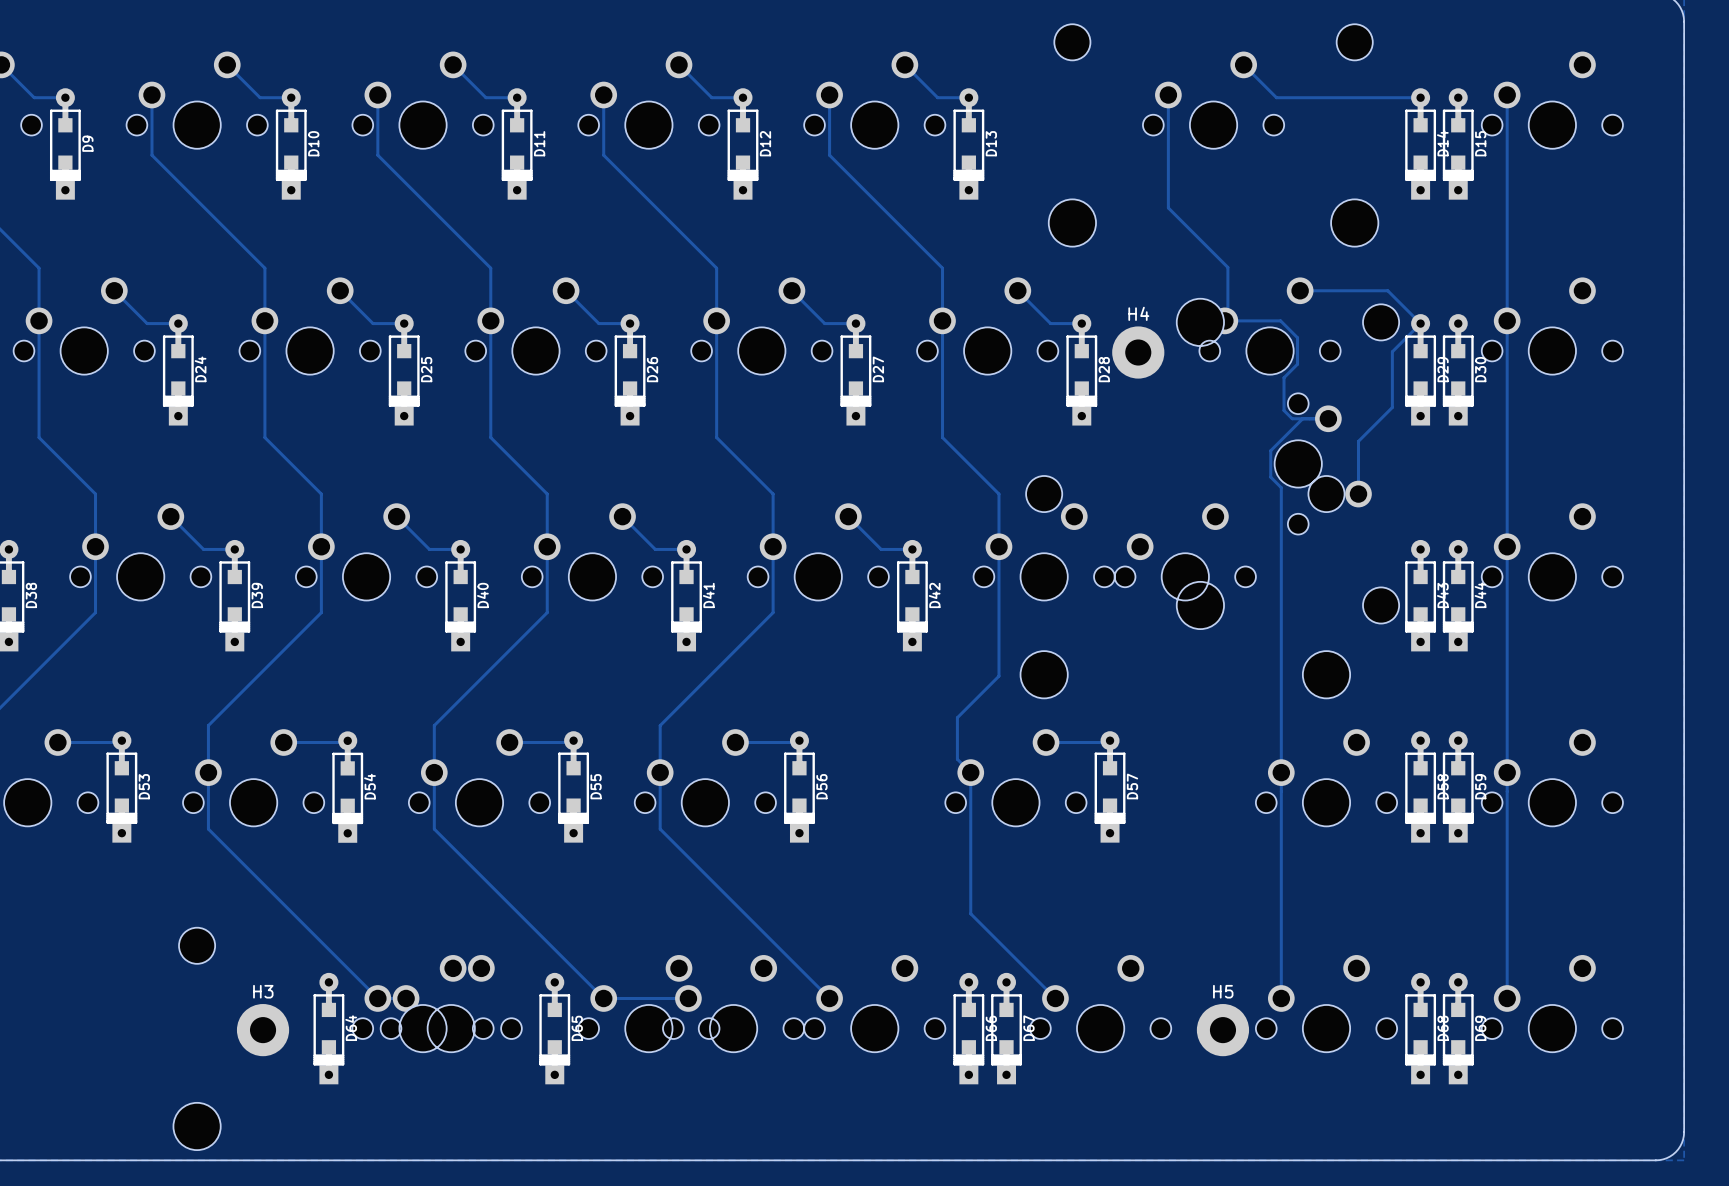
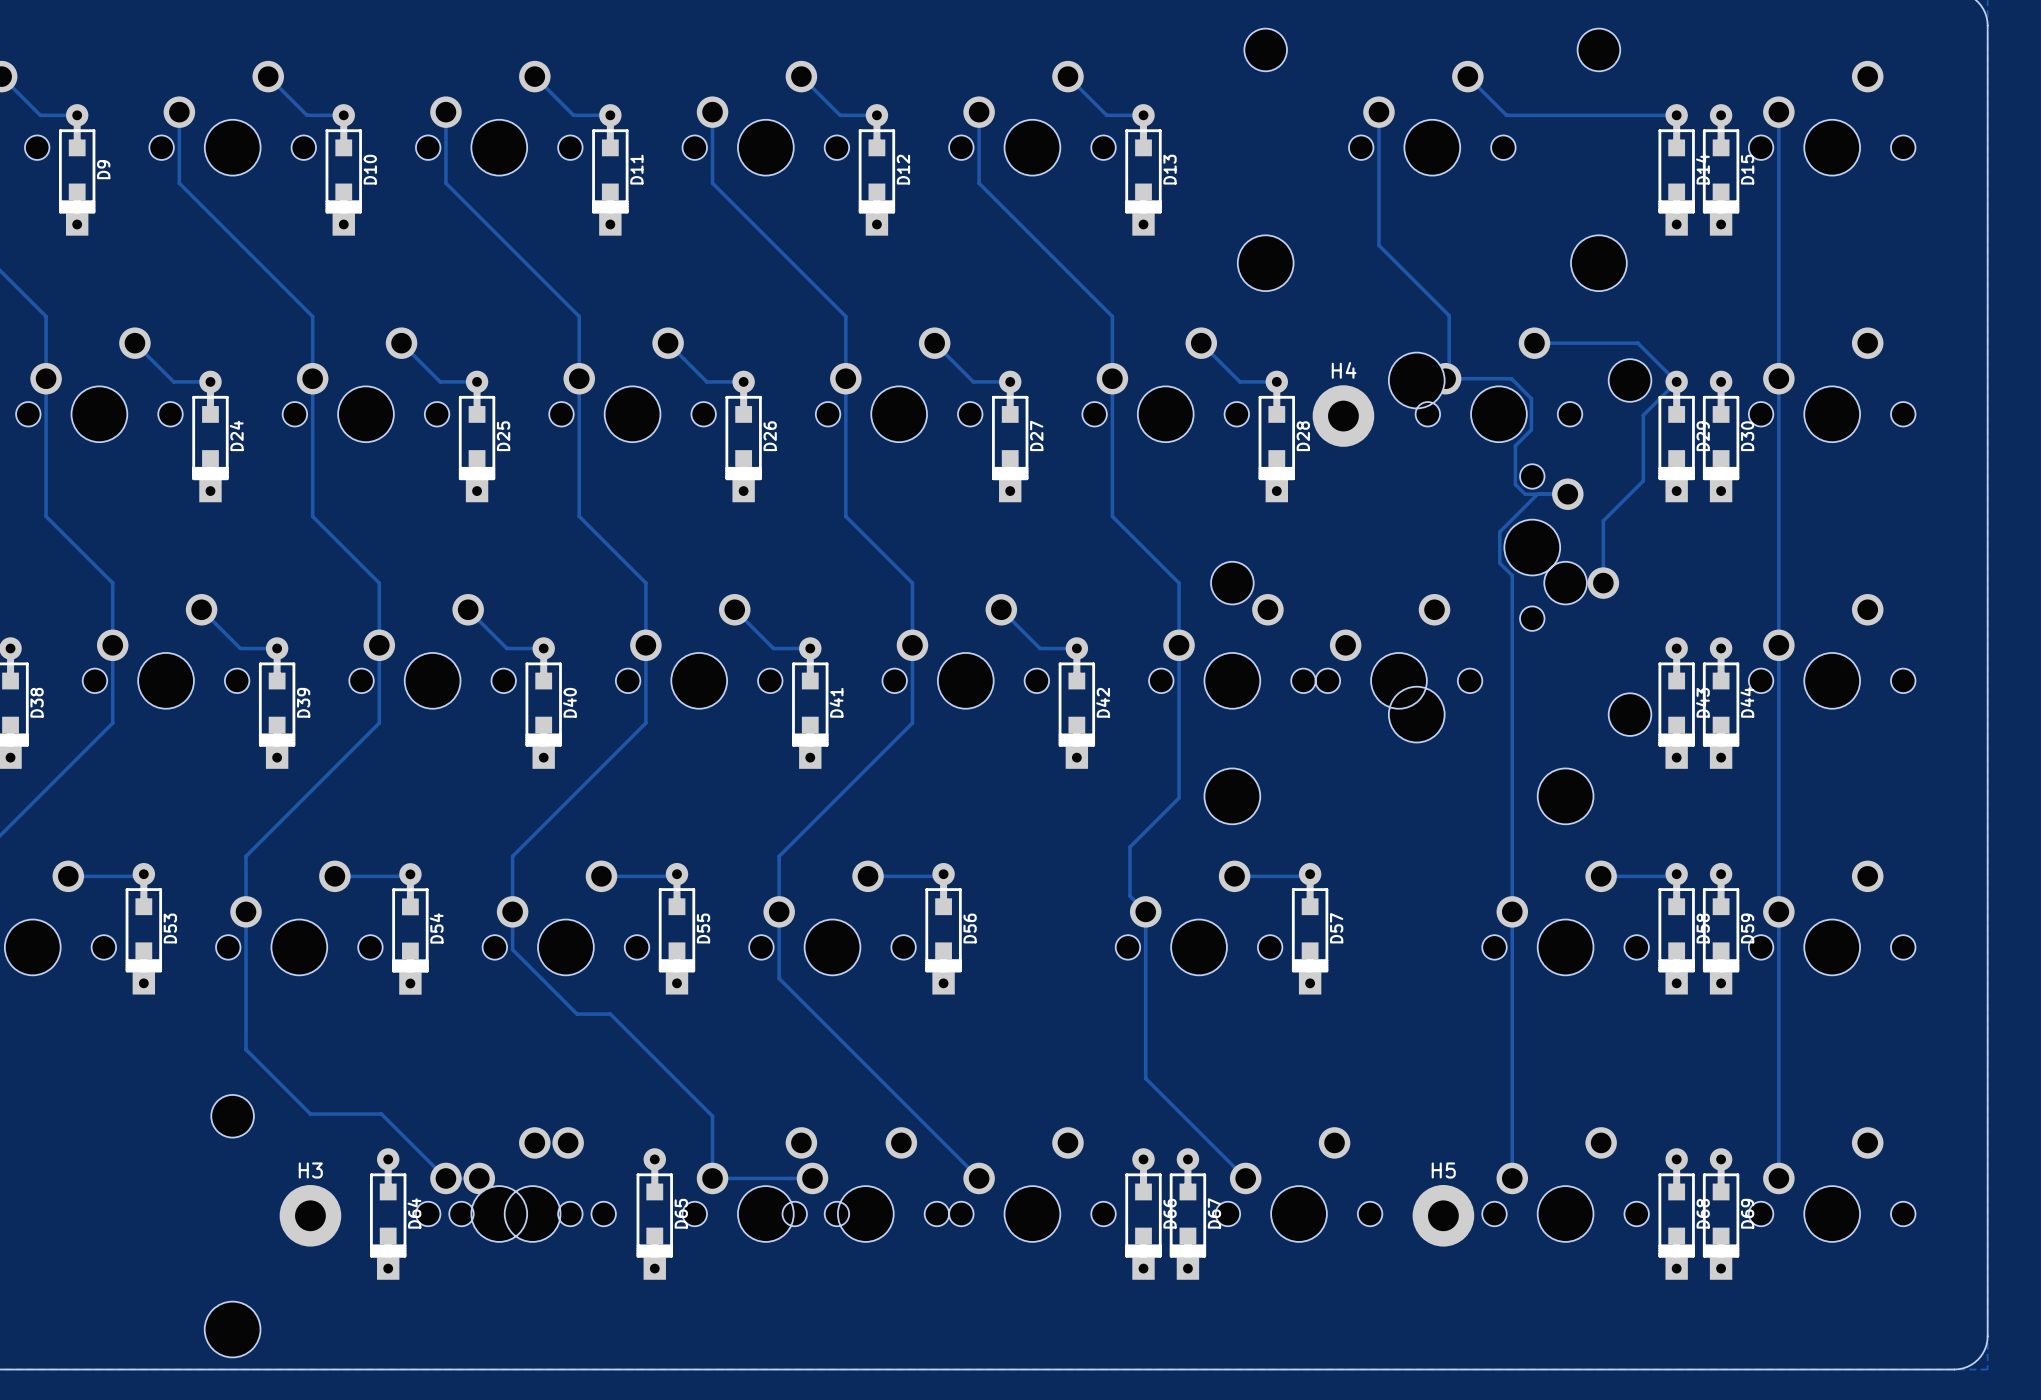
track: none -> (1676, 870) (1670, 876) (1601, 876)
track: (434, 804) (434, 829) (603, 998) -> (512, 949) (577, 1014) (610, 1014) (712, 1116) (712, 1178)
track: (208, 829) (323, 943) -> (246, 978) (246, 1049) (310, 1114) (381, 1114)

